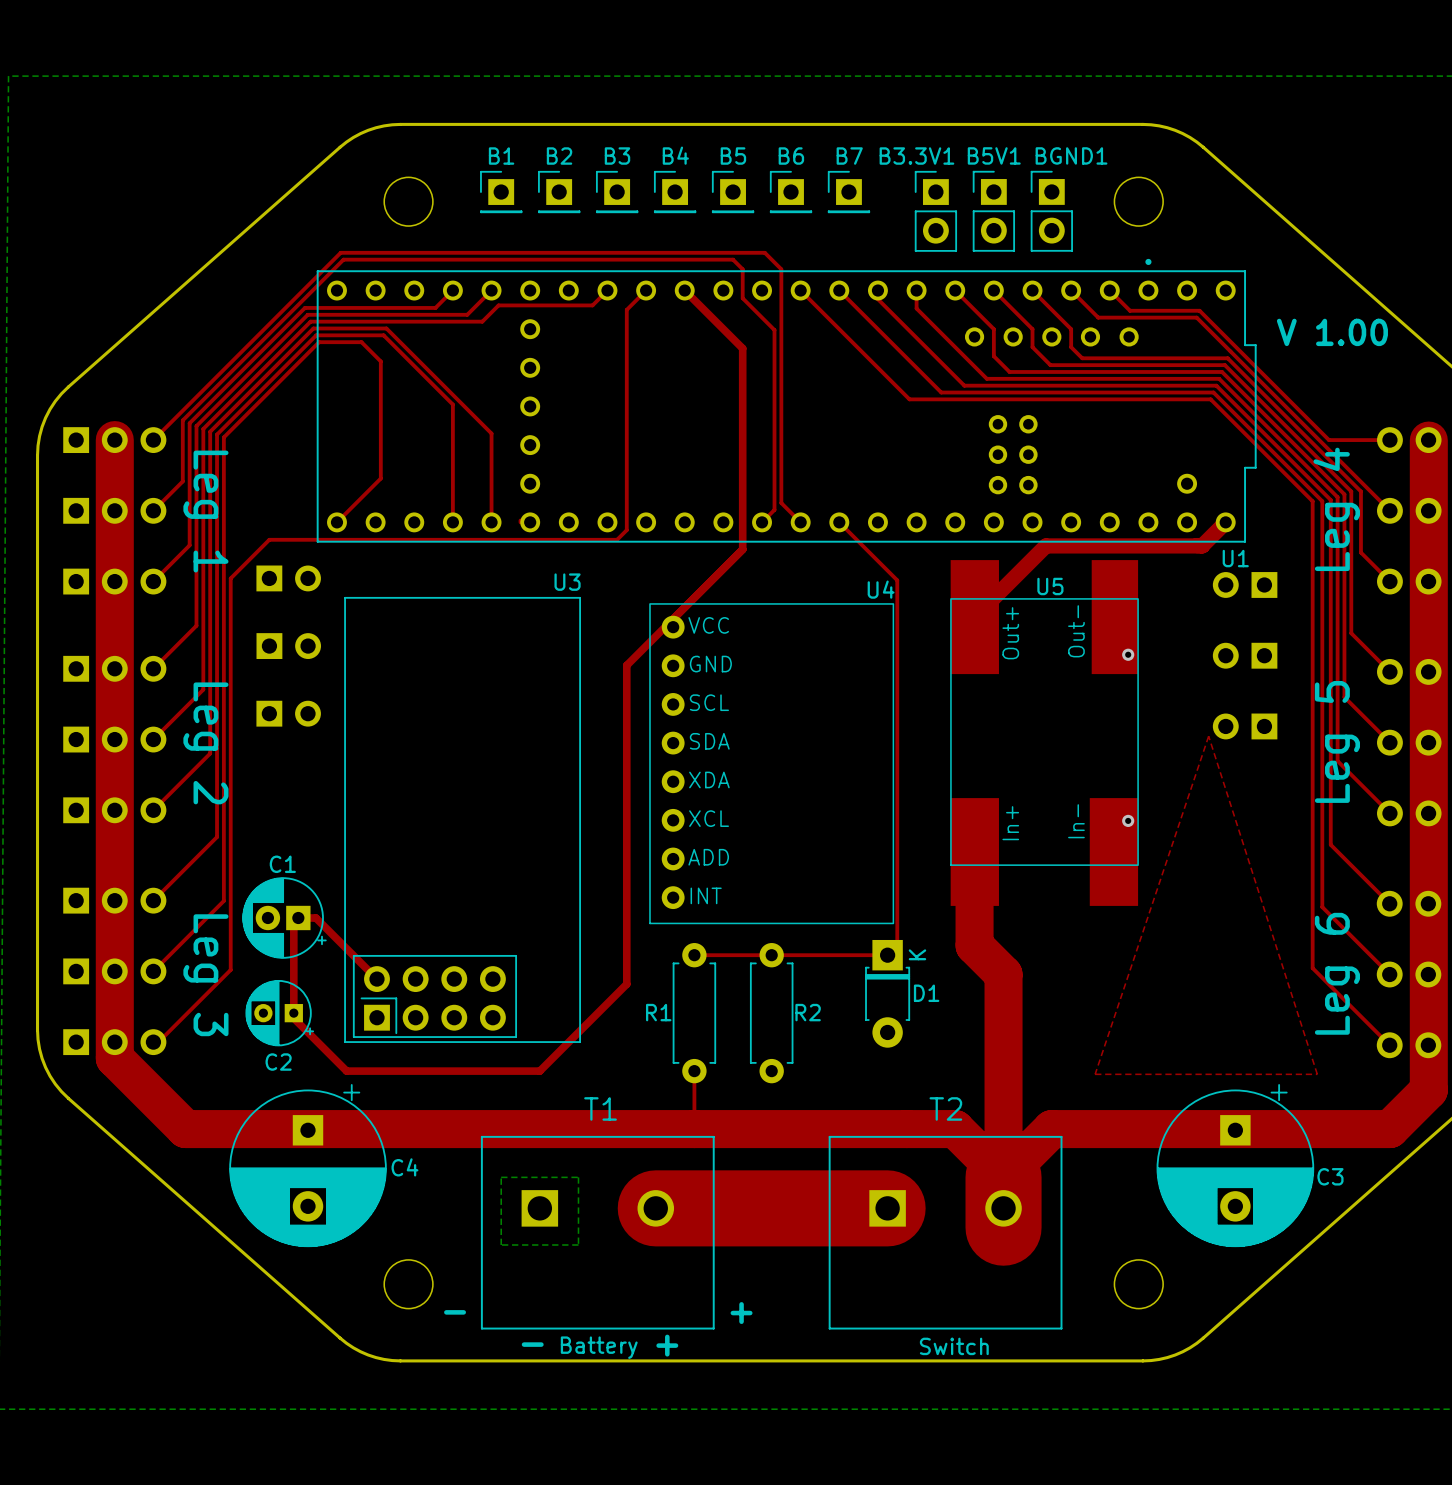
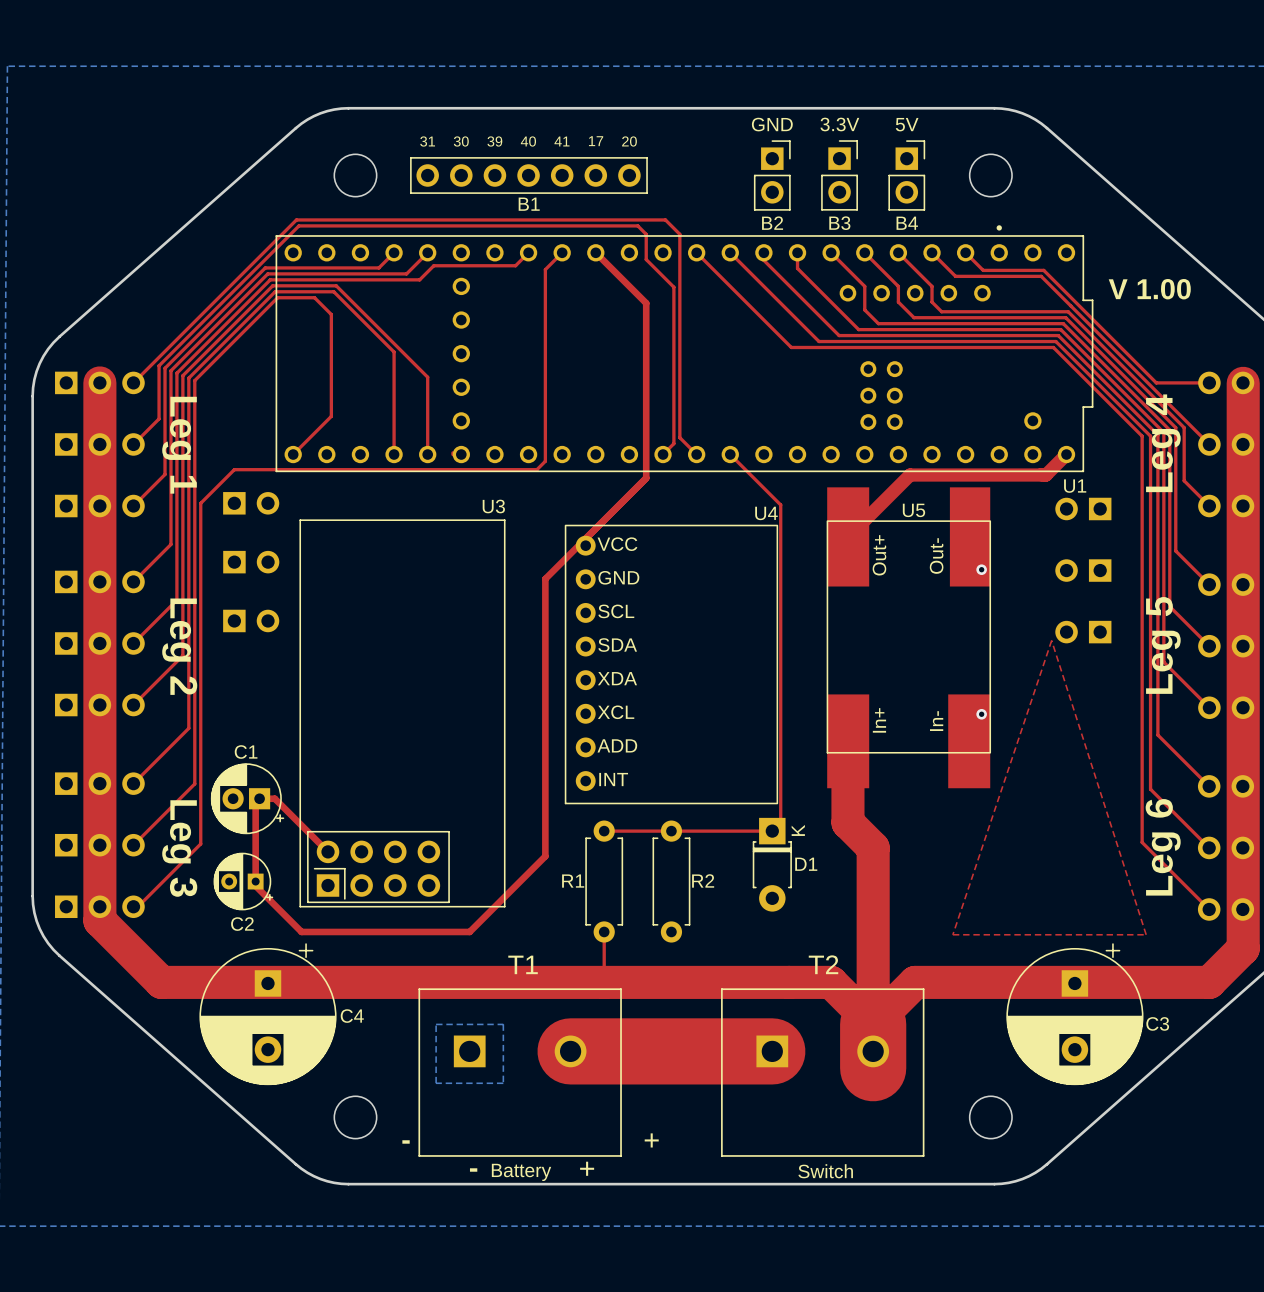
B2 value: none -> GND (772, 124)
B3 value: none -> 3.3V (839, 124)
B4 value: none -> 5V (907, 124)
B4 name position: B4 (675, 155) -> B4 (907, 223)
B1 name position: B1 (501, 156) -> B1 (529, 204)
B2 name position: B2 (559, 156) -> B2 (772, 223)
B3 name position: B3 (617, 156) -> B3 (839, 223)
text: none -> 31 (427, 141)
text: none -> 30 (461, 141)
text: none -> 39 (494, 141)
text: none -> 40 (528, 141)
text: none -> 41 (561, 141)
text: none -> 17 (596, 141)
text: none -> 20 (629, 141)
B1 footprint: [480, 170, 523, 214] -> [410, 157, 648, 194]
B2 footprint: [538, 170, 581, 214] -> [753, 140, 791, 211]
B3 footprint: [595, 170, 639, 214] -> [821, 140, 858, 211]
B4 footprint: [653, 170, 697, 214] -> [888, 140, 926, 211]
B5: (733, 192) -> none
B6: (791, 192) -> none
B7: (848, 192) -> none
B3.3V1: (935, 211) -> none
B5V1: (993, 211) -> none
BGND1: (1051, 211) -> none

